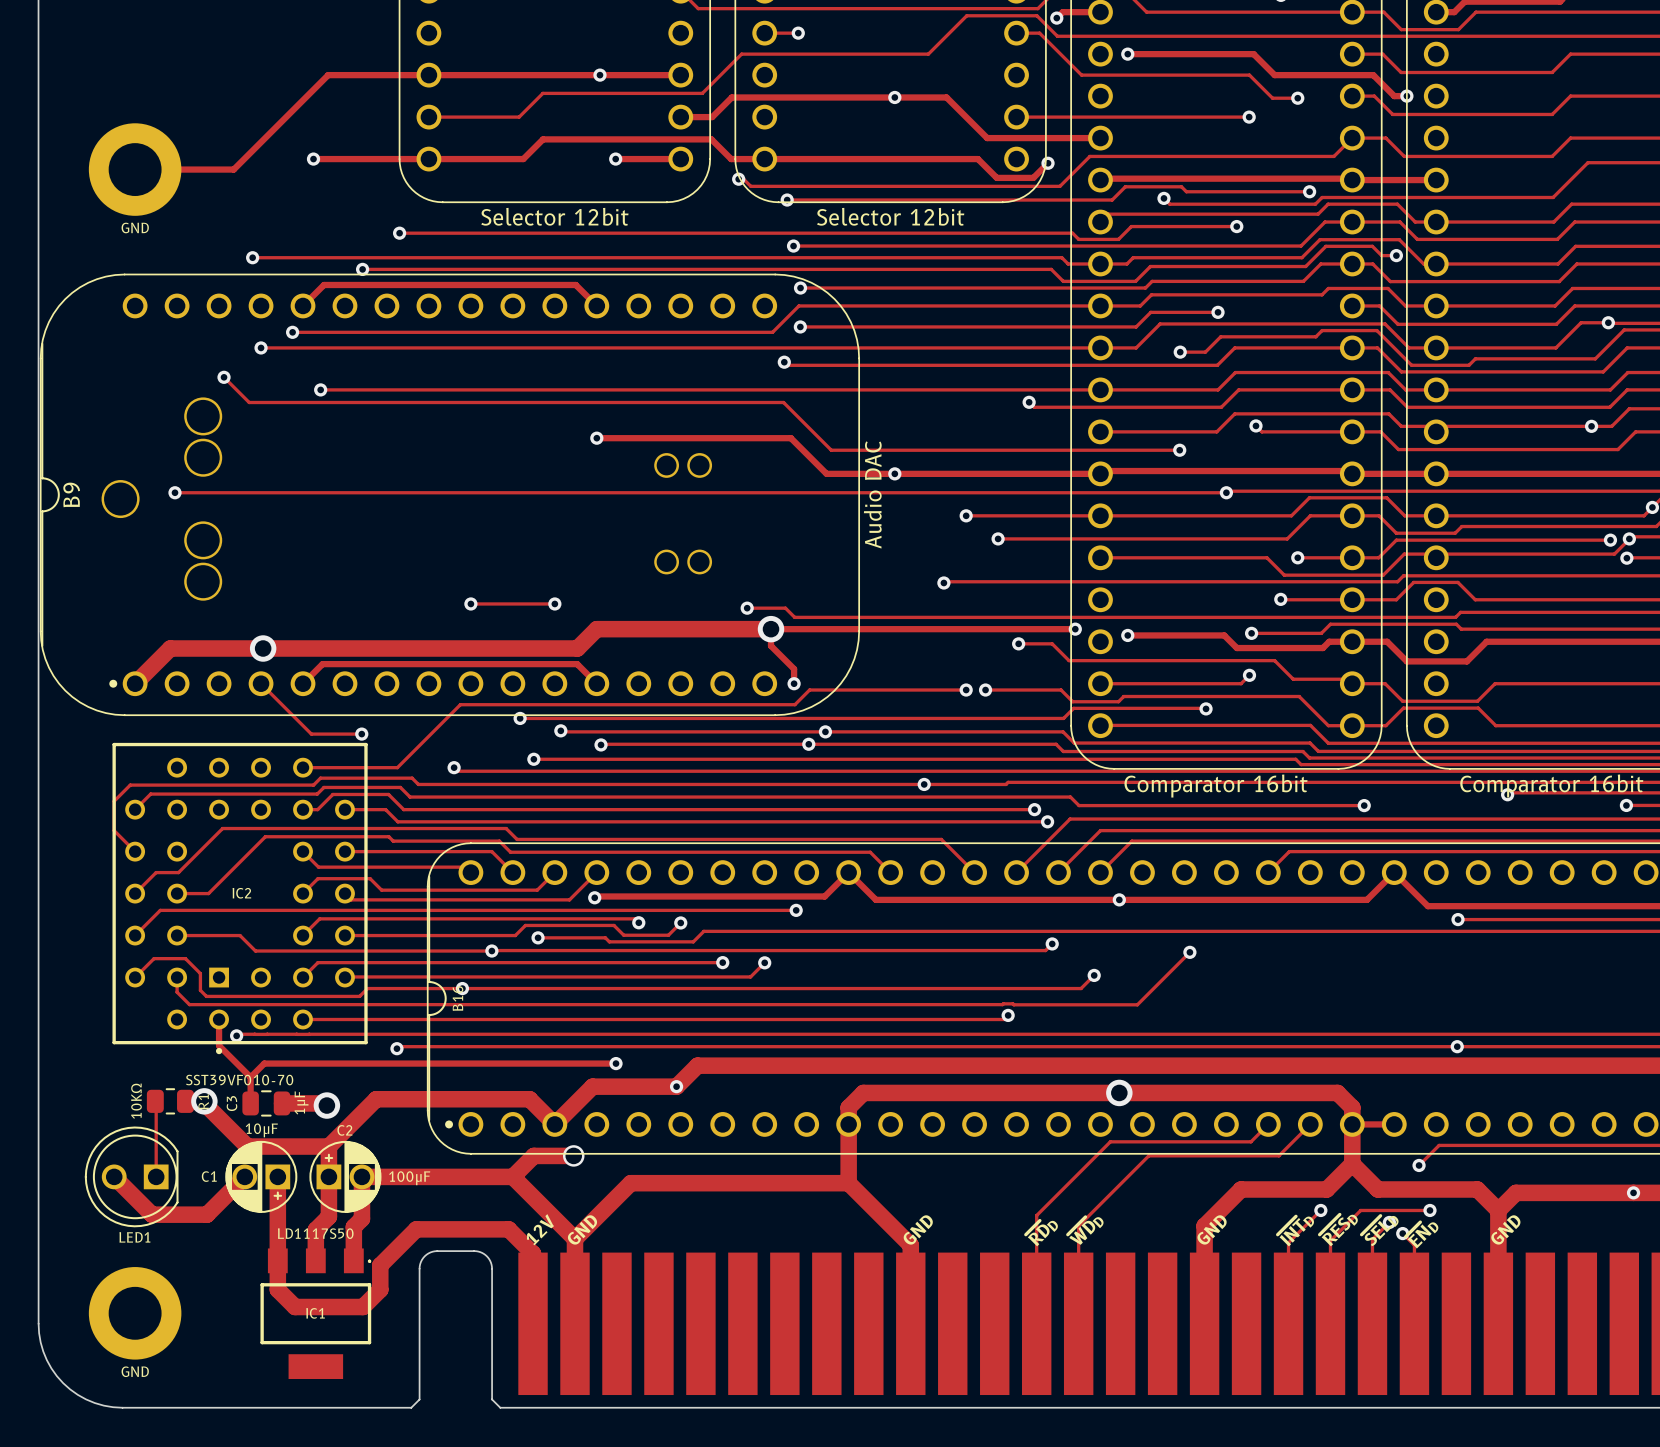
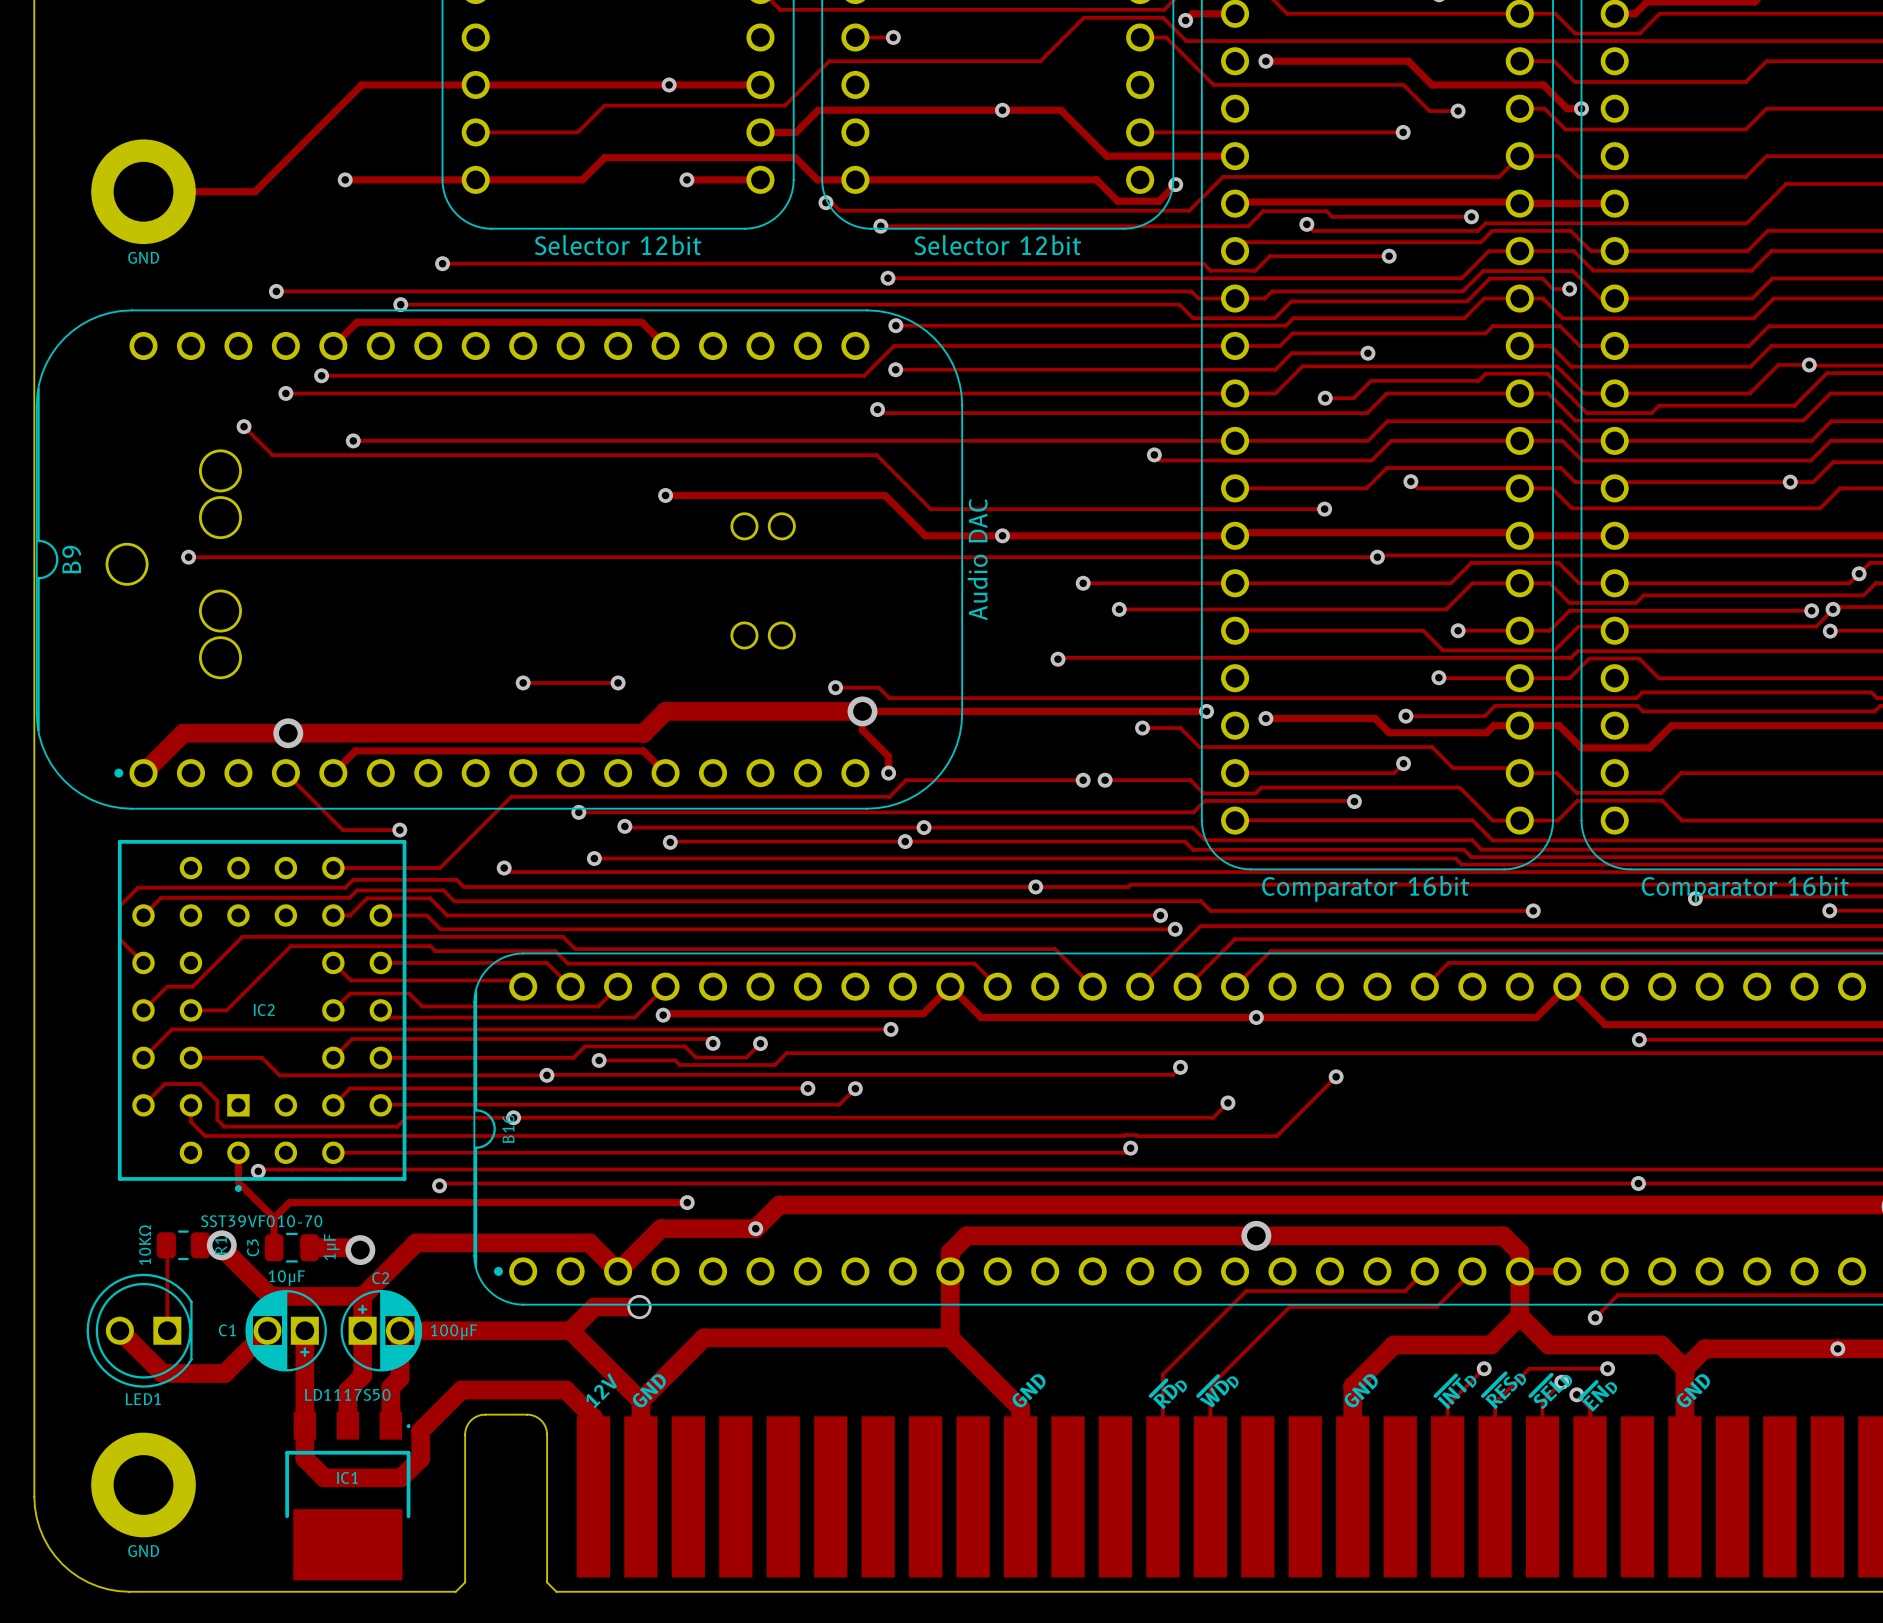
IC1 footprint: [260, 1248, 372, 1379] -> [285, 1411, 411, 1581]

